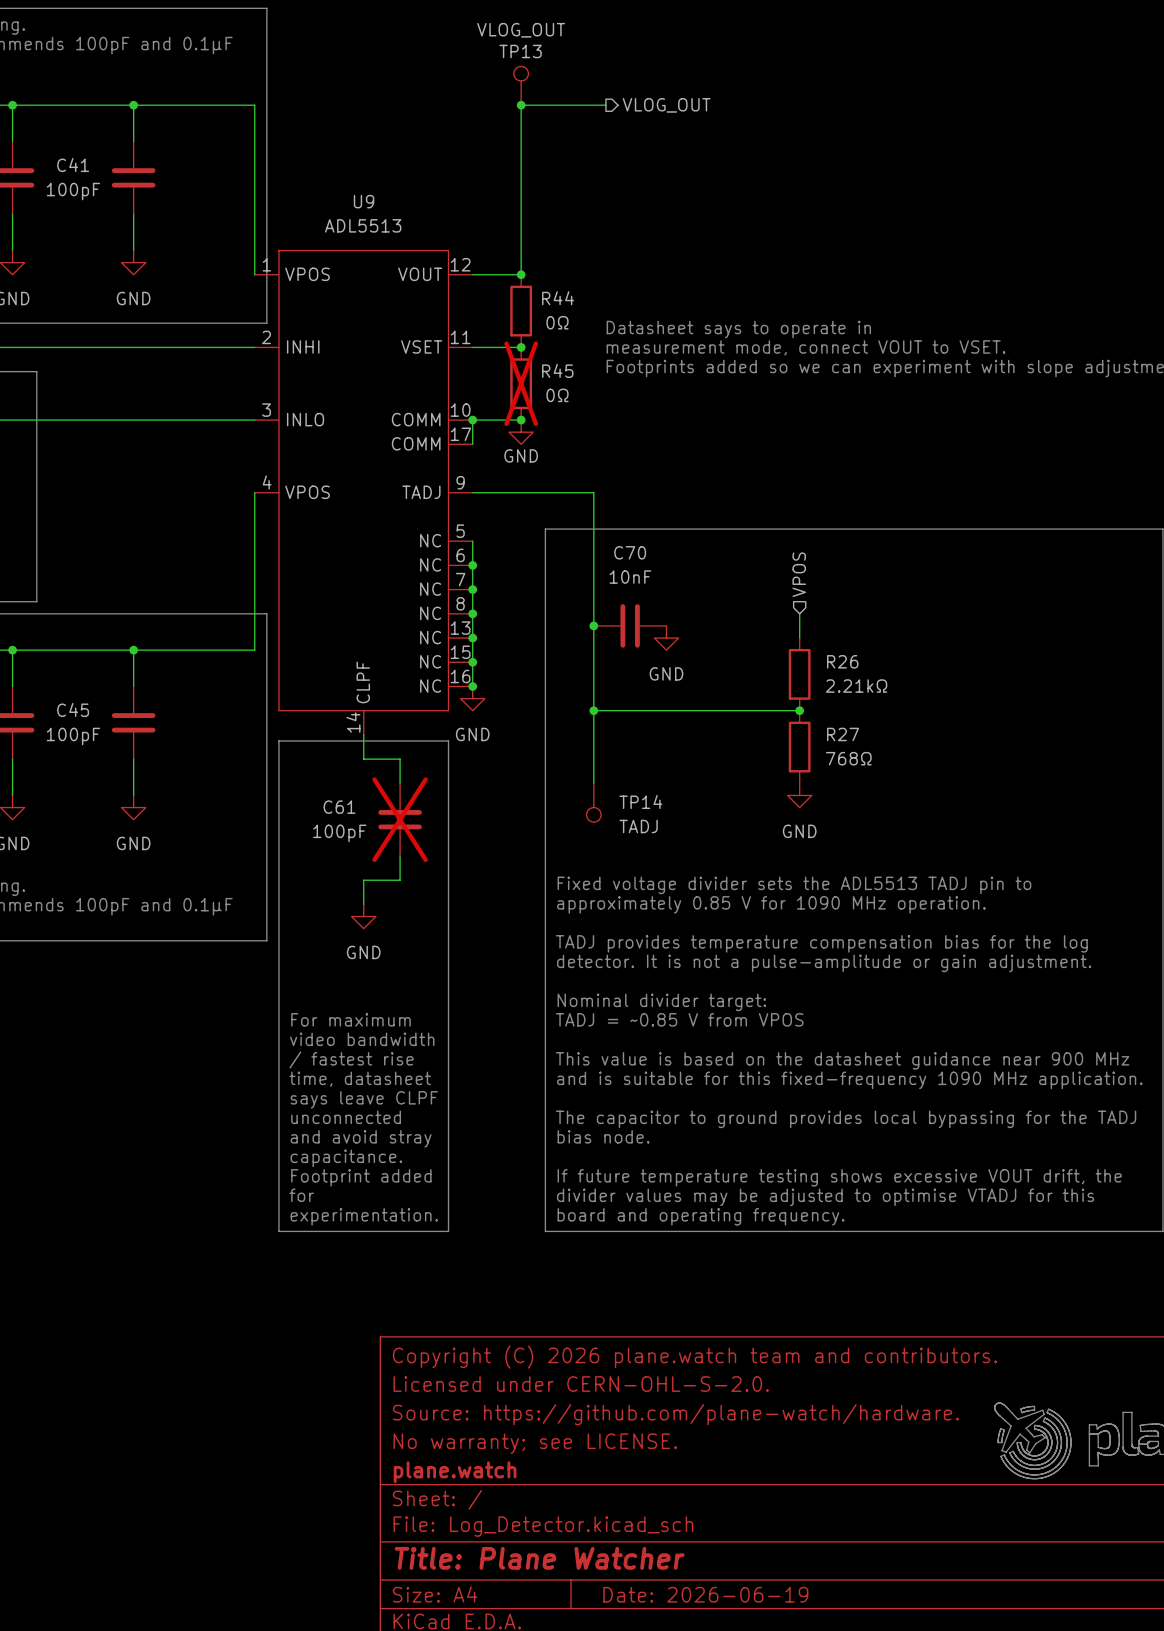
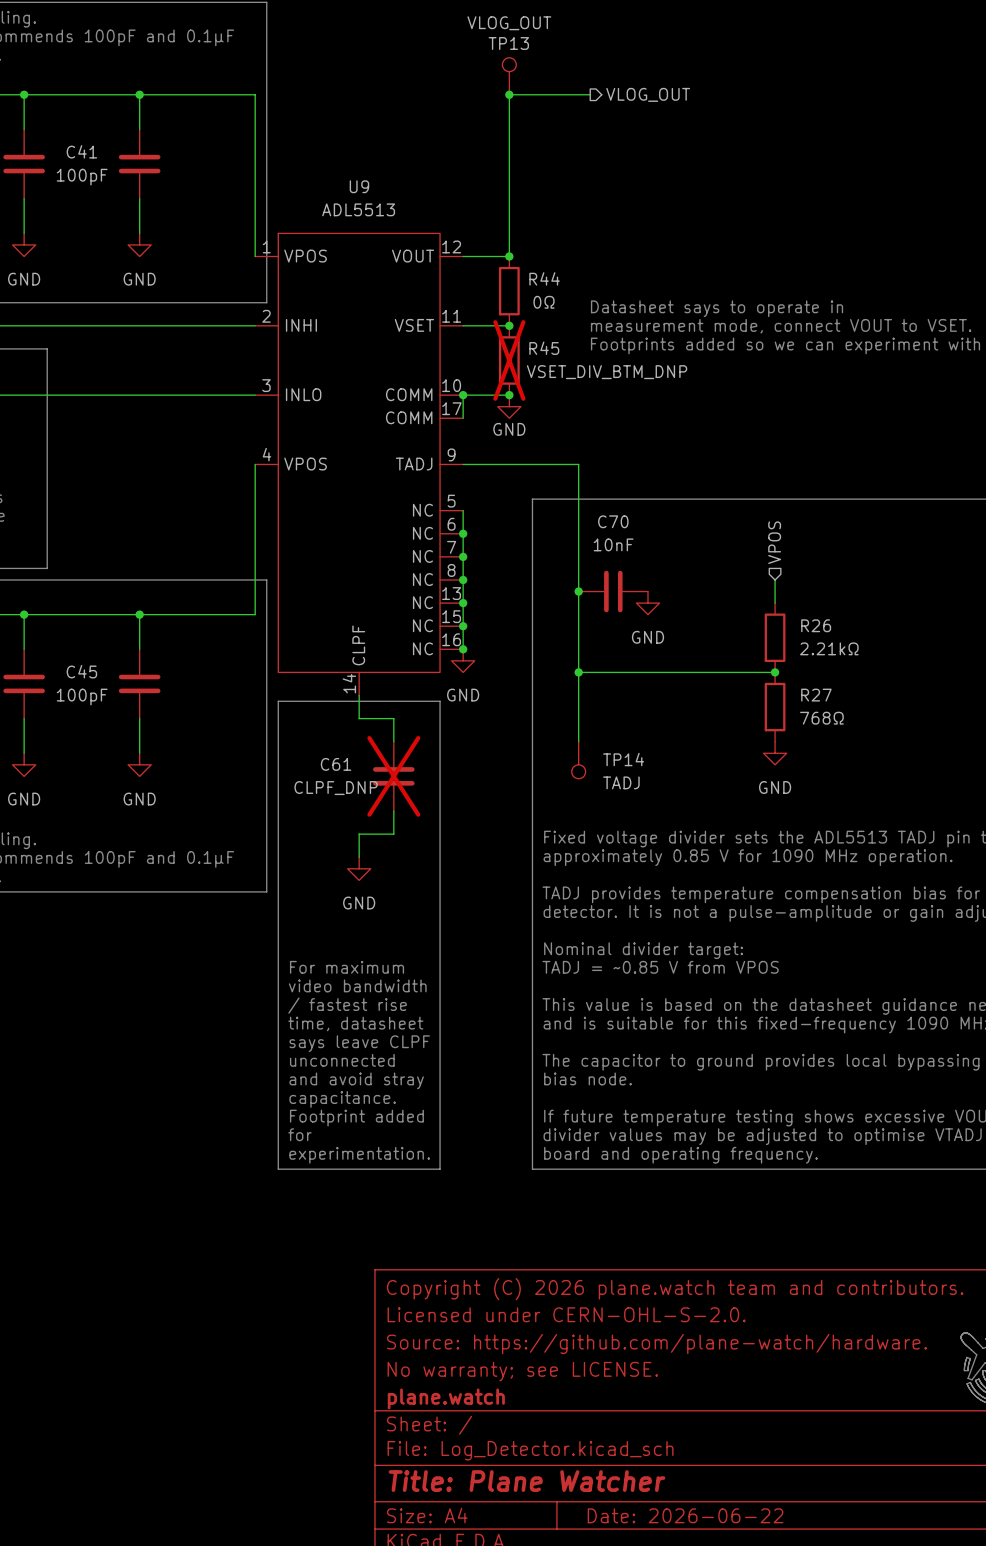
R45 value: 0Ω (557, 395) -> VSET_DIV_BTM_DNP (607, 372)
C61 value: 100pF (339, 833) -> CLPF_DNP (336, 788)
title block: Date: 2026-06-19 (705, 1594) -> Date: 2026-06-22 (685, 1515)

